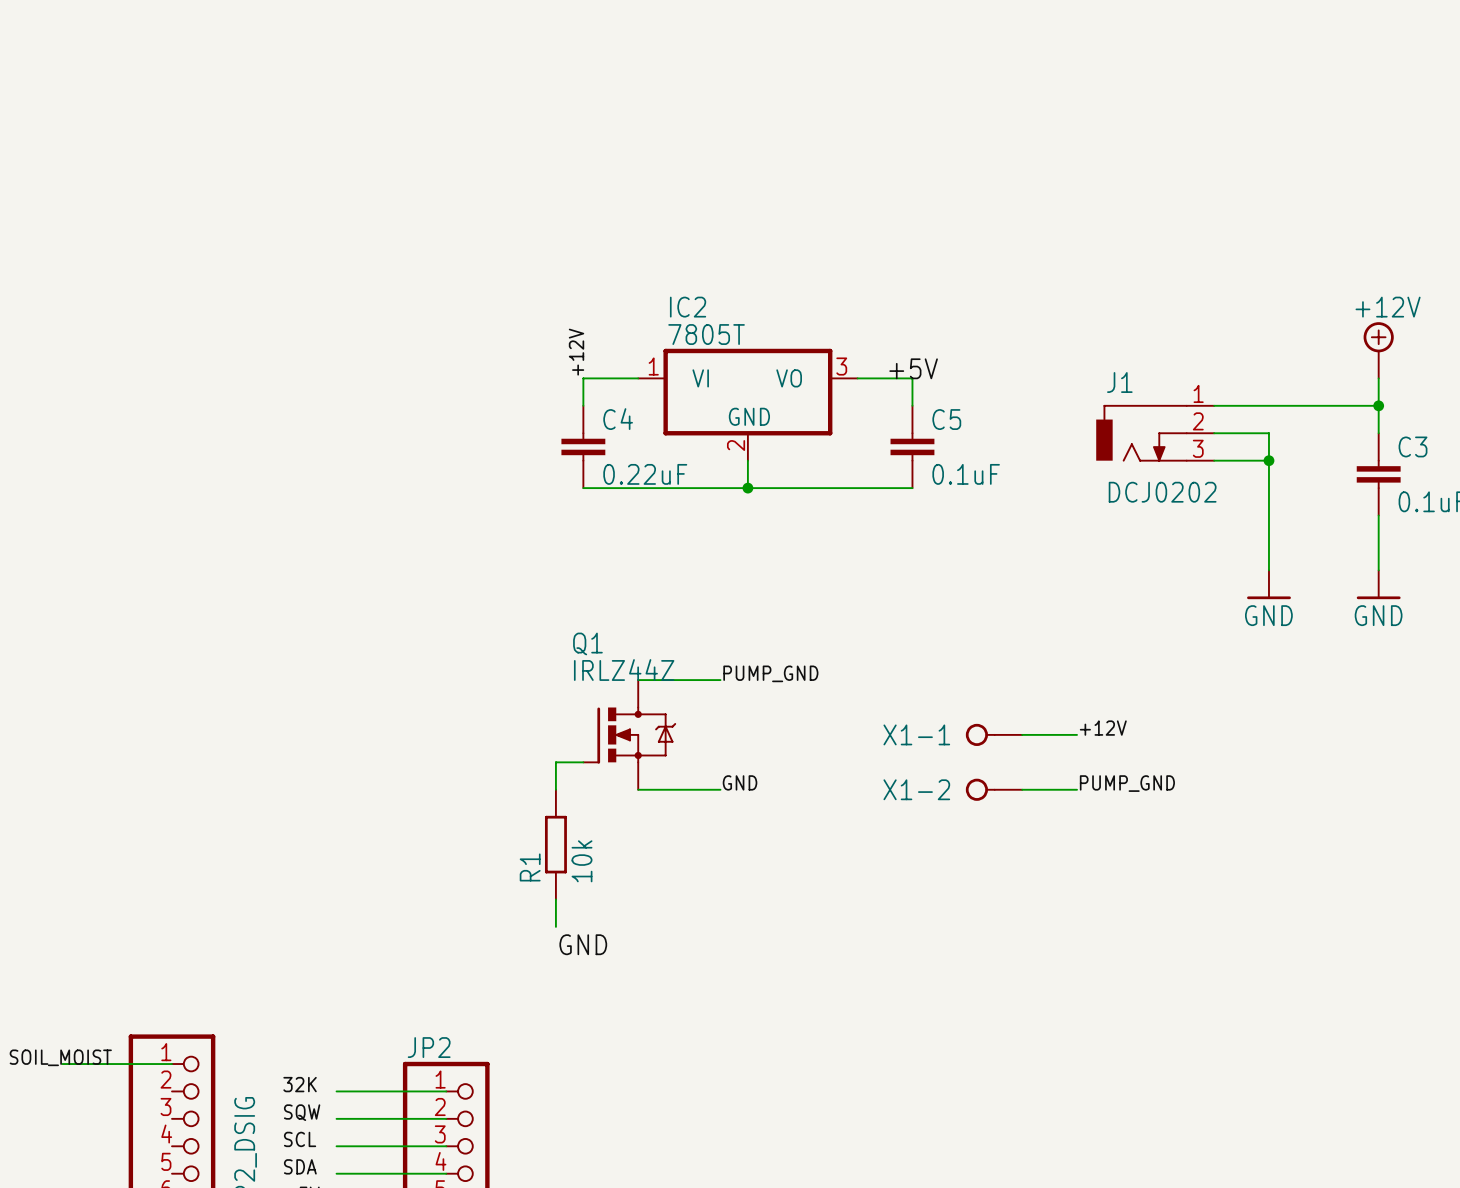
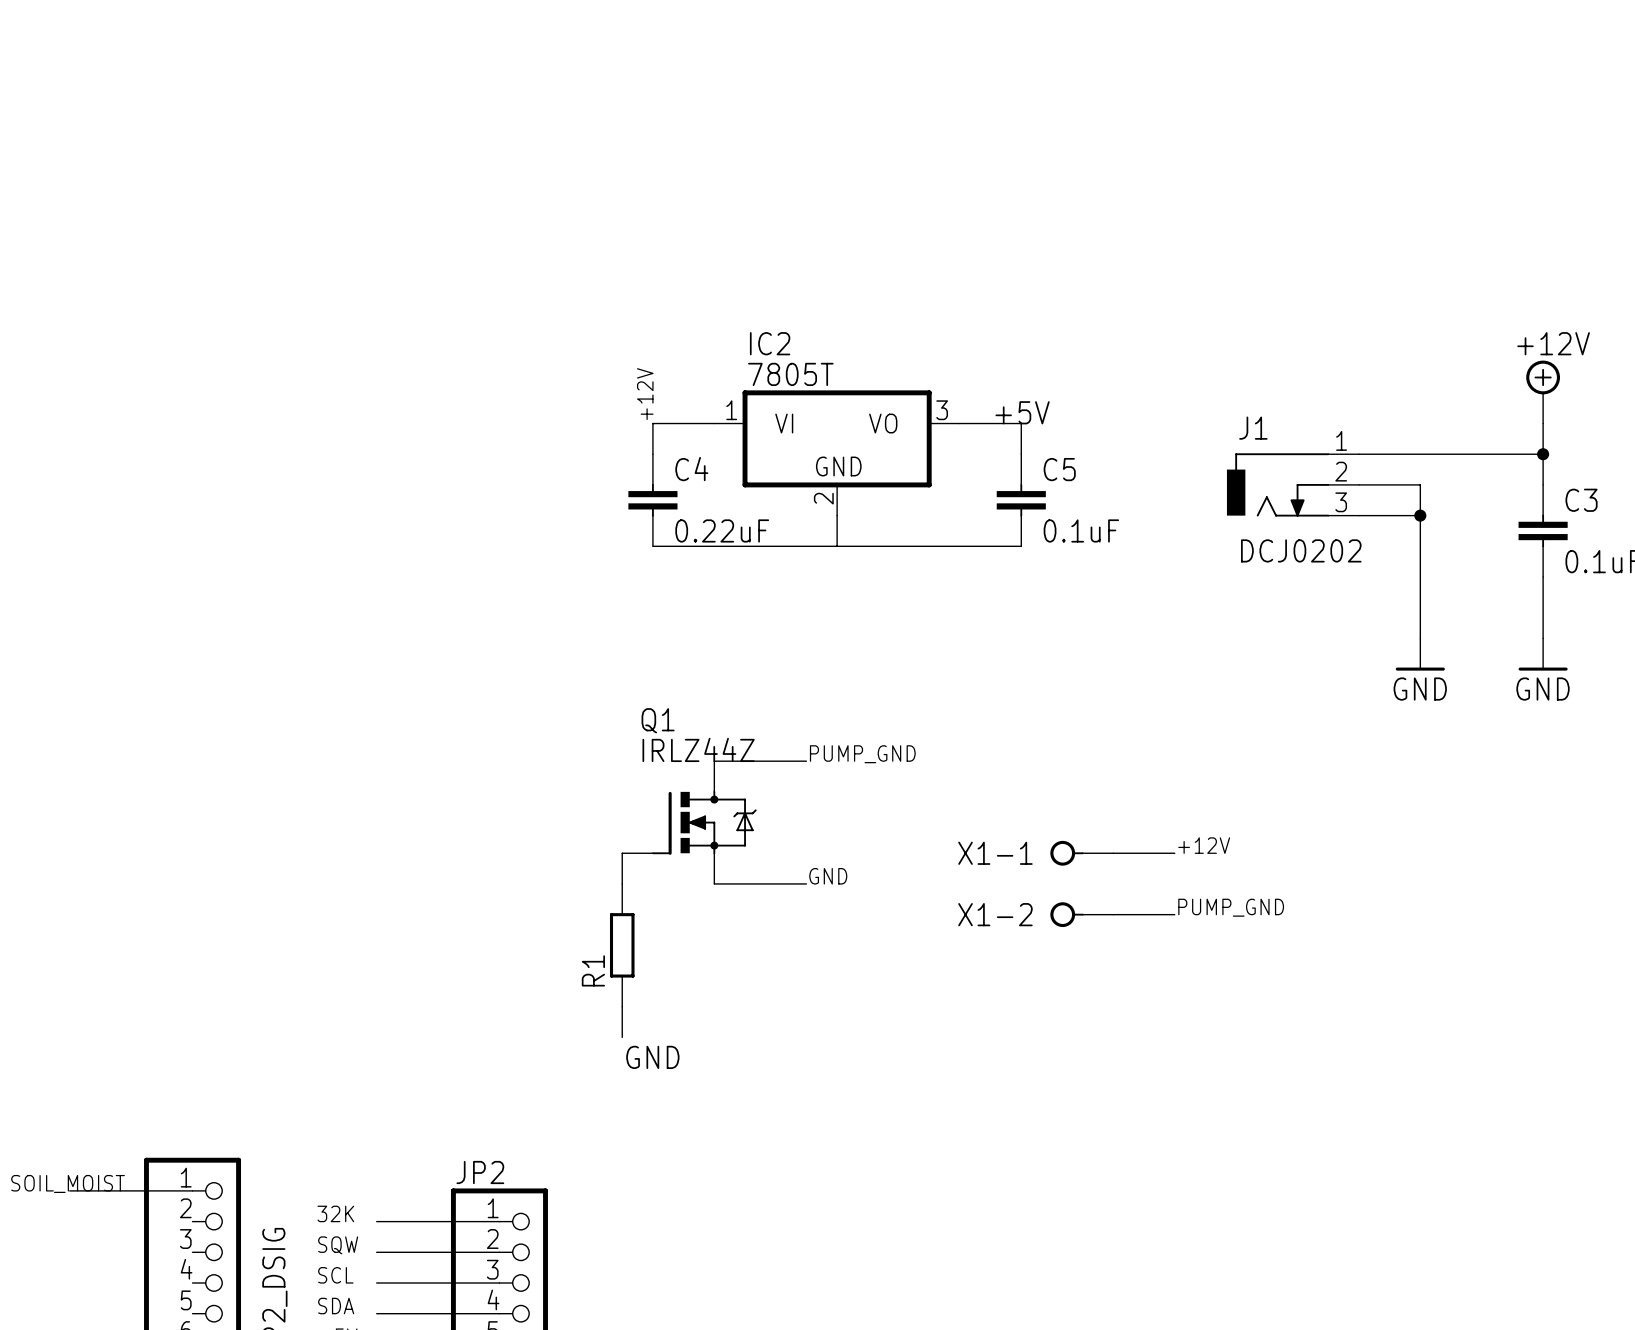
junction: (747, 488) -> none
label position: +12V (1103, 728) -> +12V (1204, 845)
X1-1 position: (994, 734) -> (1081, 853)
wire: (1022, 734) (1077, 734) -> (1113, 853) (1174, 853)
label position: PUMP_GND (1127, 783) -> PUMP_GND (1231, 907)
X1-2 position: (994, 789) -> (1081, 914)
wire: (1022, 789) (1077, 789) -> (1113, 914) (1174, 914)
R1 value: 10k (582, 861) -> none

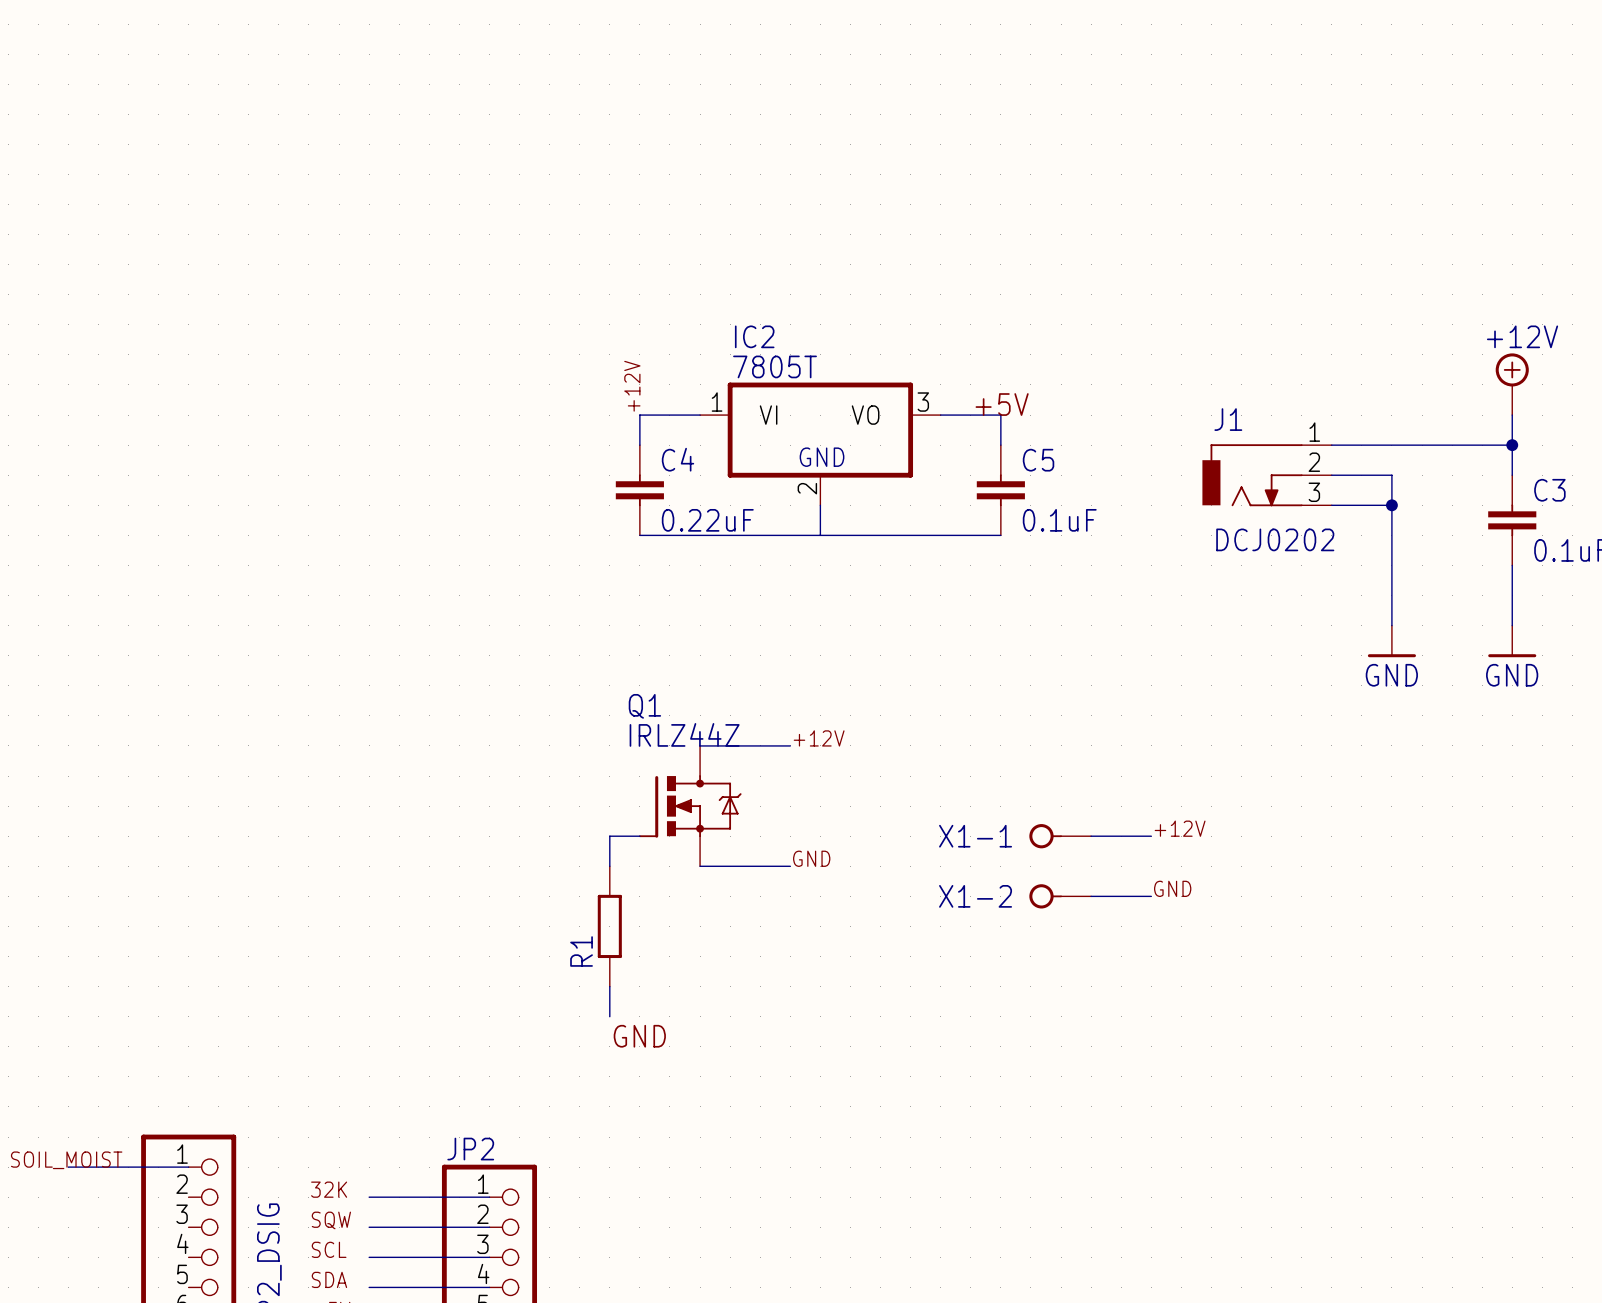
label: PUMP_GND (862, 754) -> +12V (819, 738)
label: PUMP_GND (1231, 907) -> GND (1172, 888)

